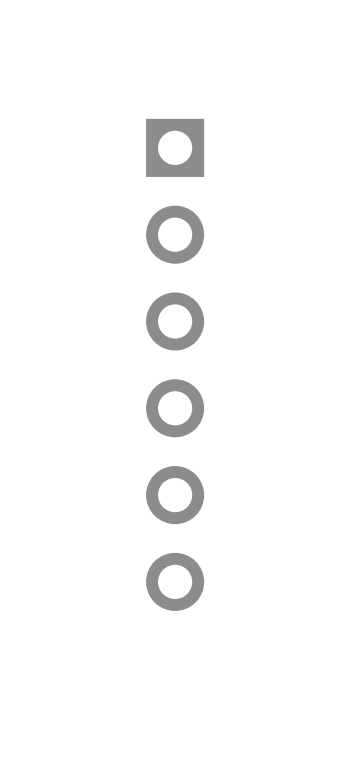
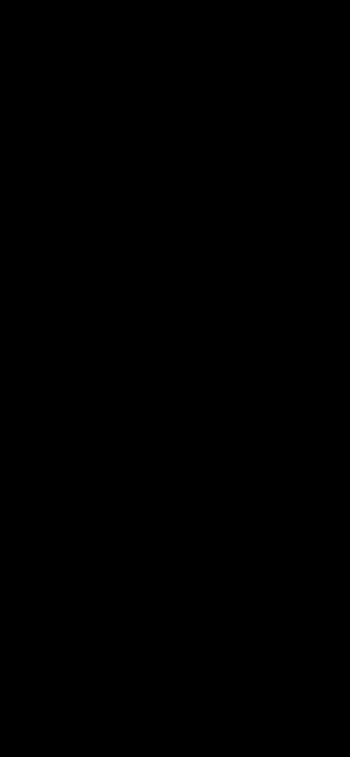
part: (175, 364) -> none

